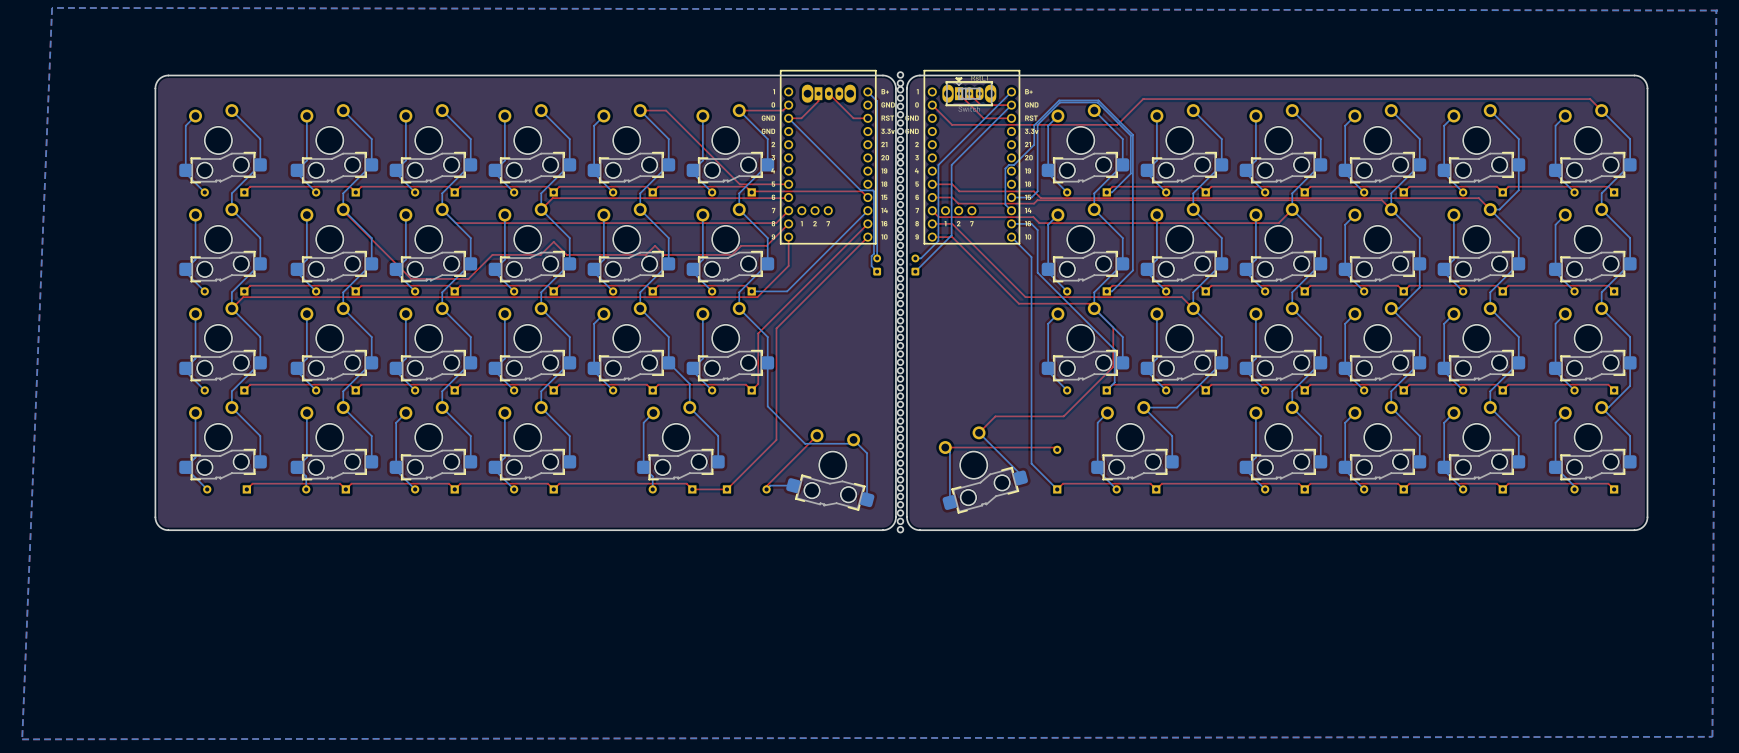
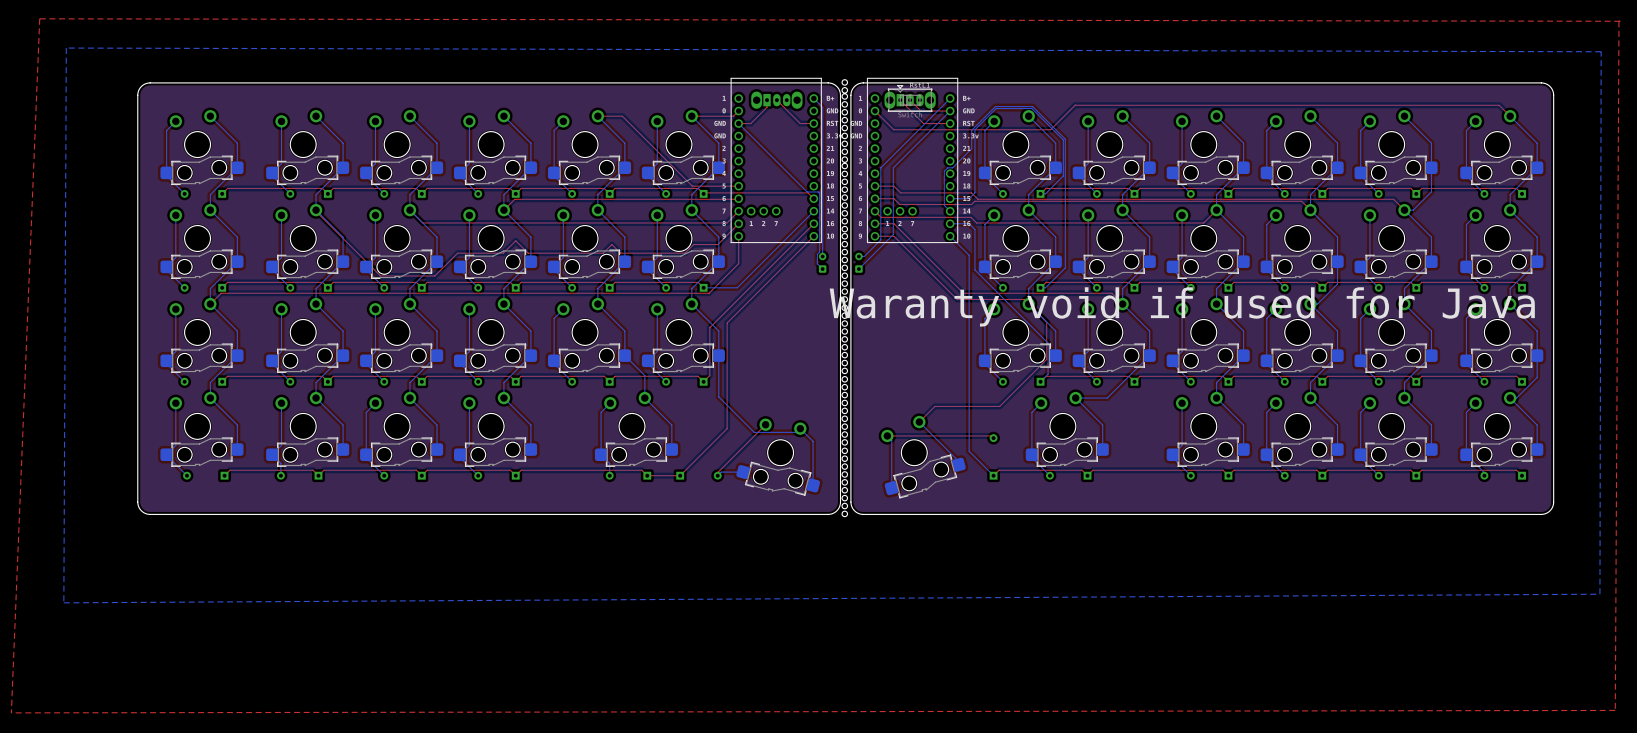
bottom zone outline: (52, 7) (1717, 10) (1712, 736) (22, 739) (52, 7) -> (66, 48) (1601, 51) (1599, 594) (63, 602) (66, 48)
text: none -> Waranty void if used for Java (1182, 306)

